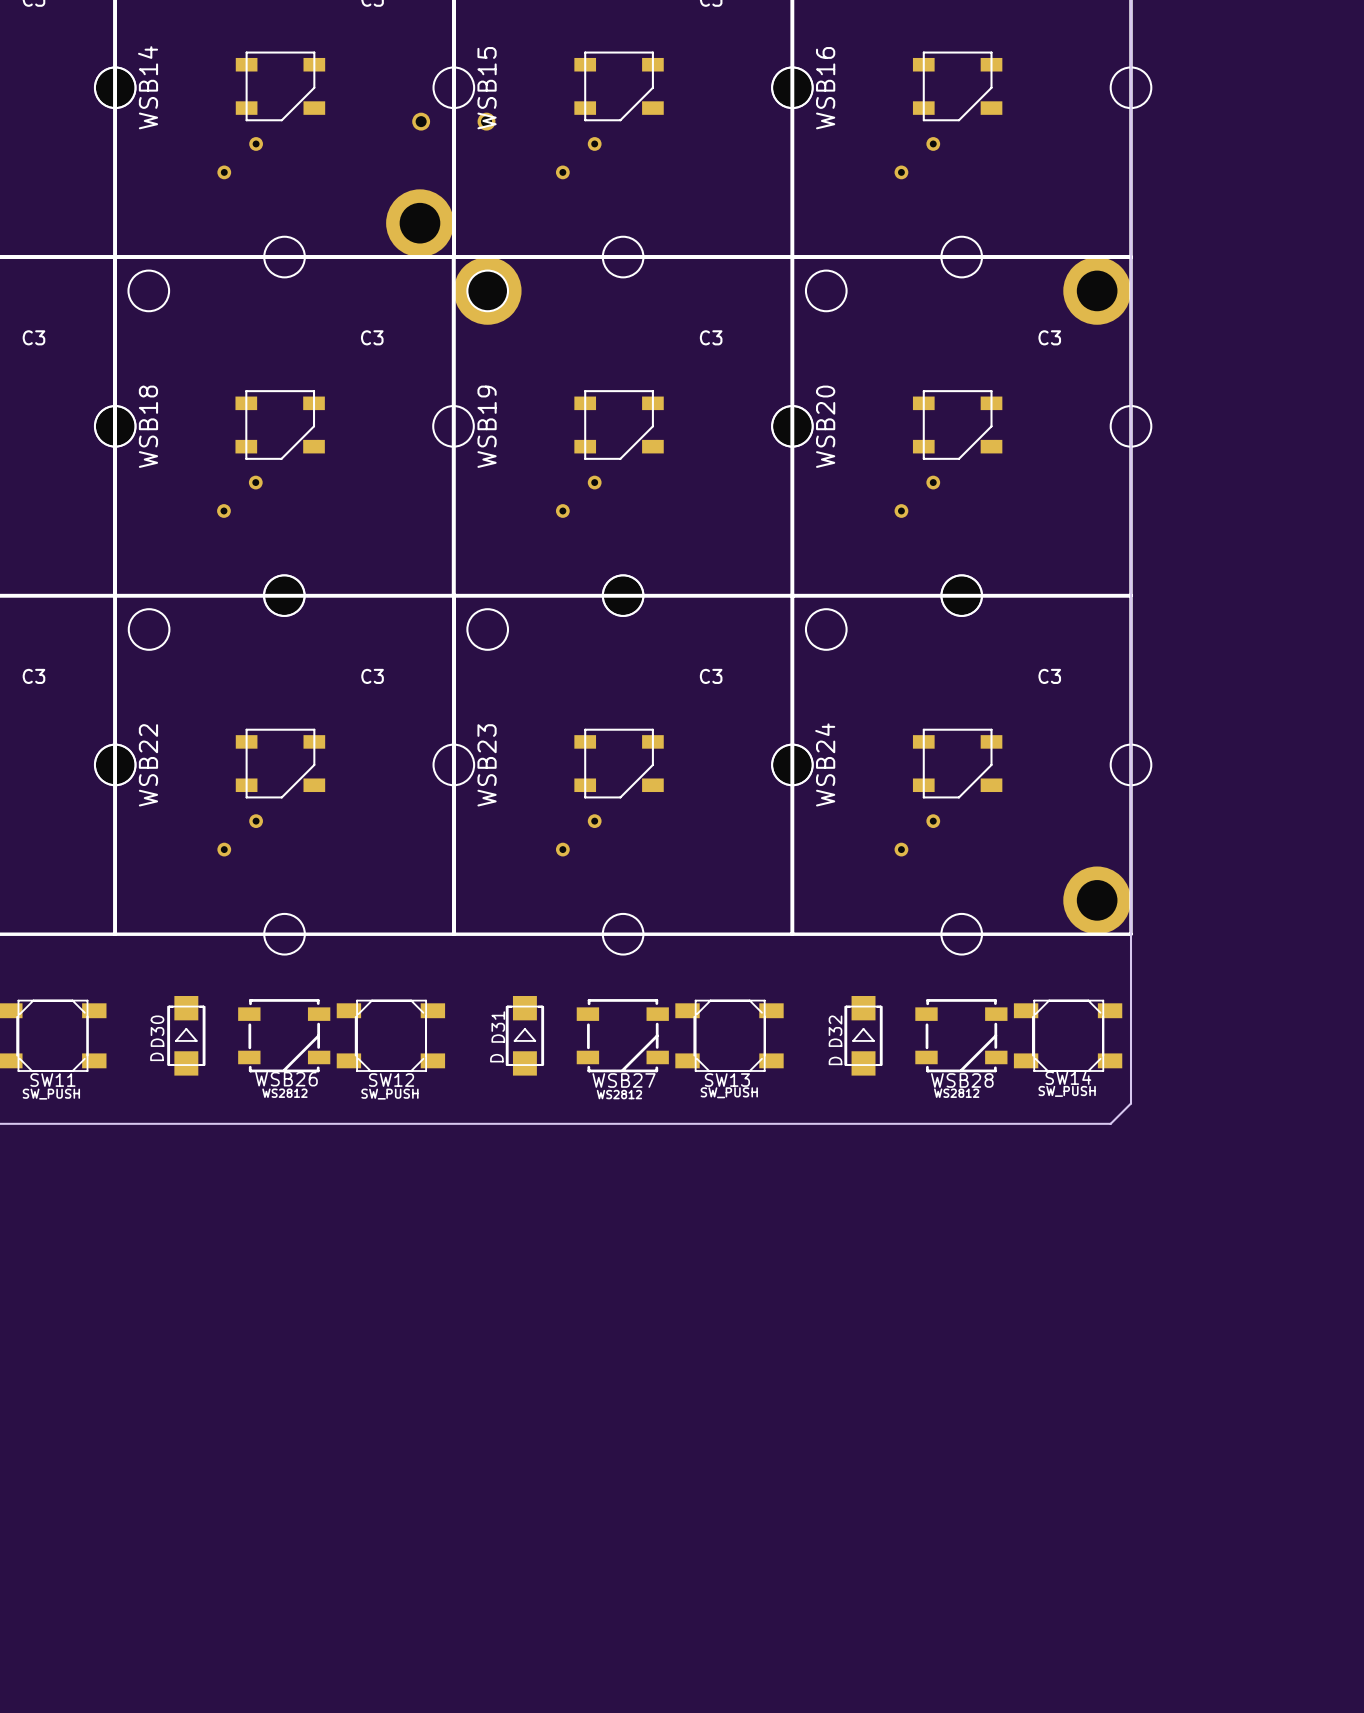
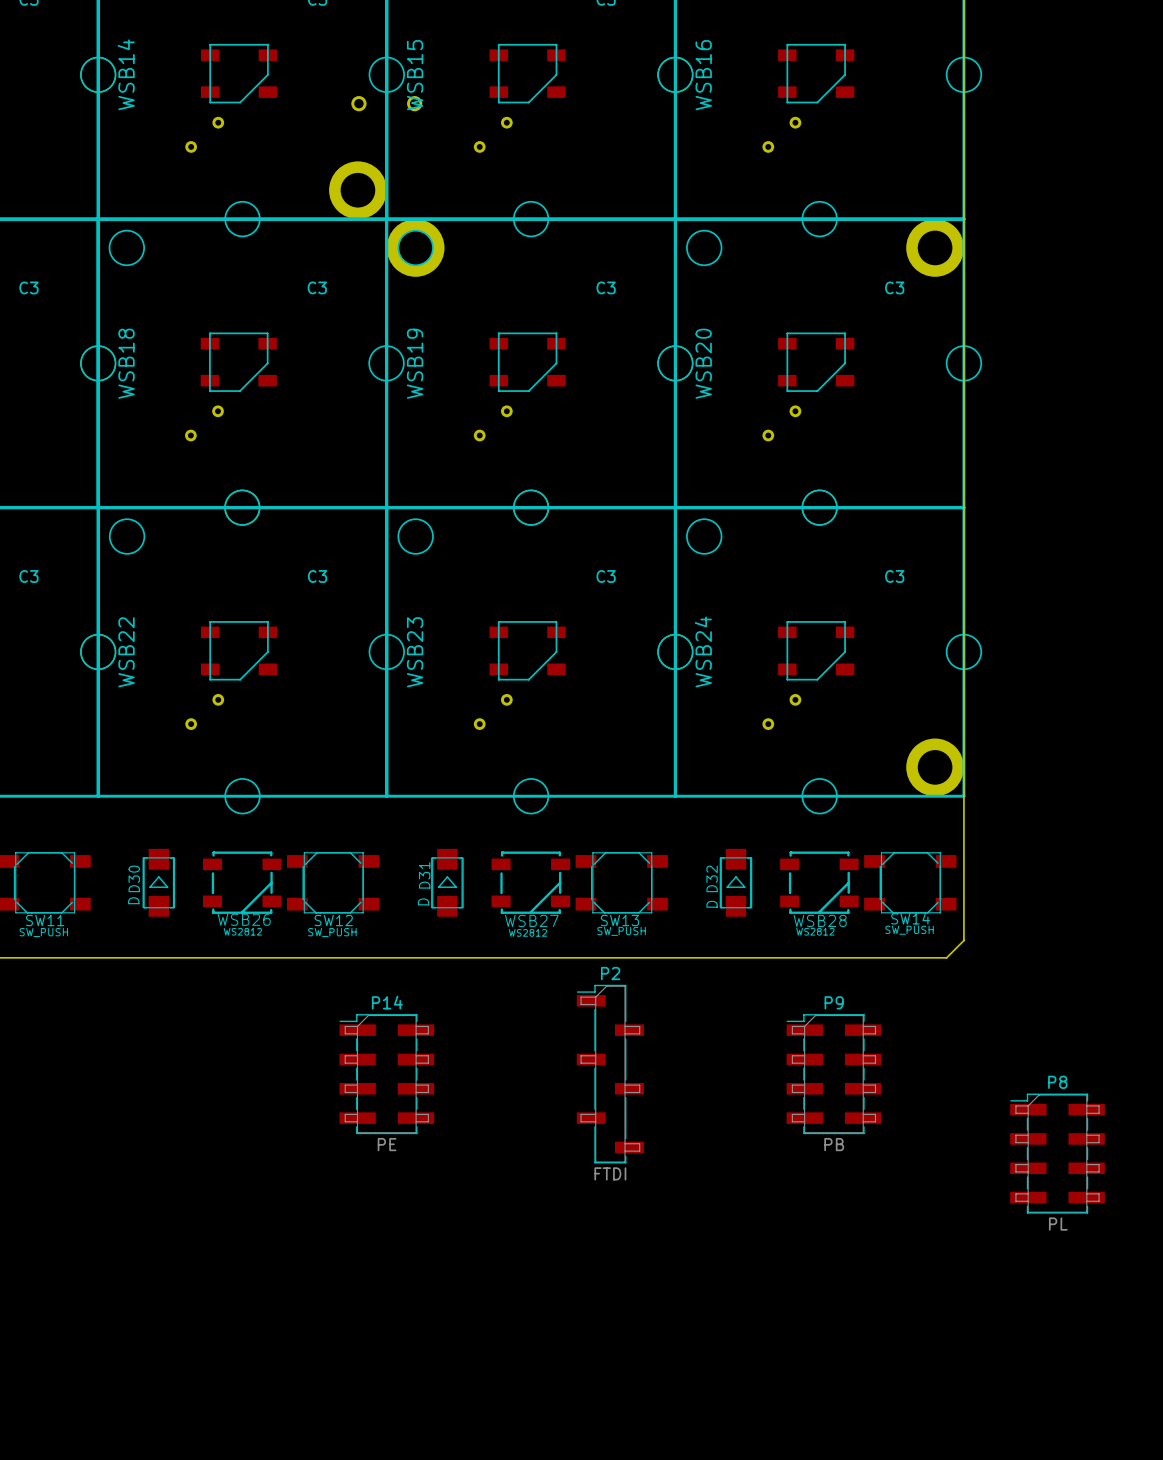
P14: none -> PE (386, 1074)
P2: none -> FTDI (610, 1074)
P9: none -> PB (833, 1074)
P8: none -> PL (1057, 1153)

